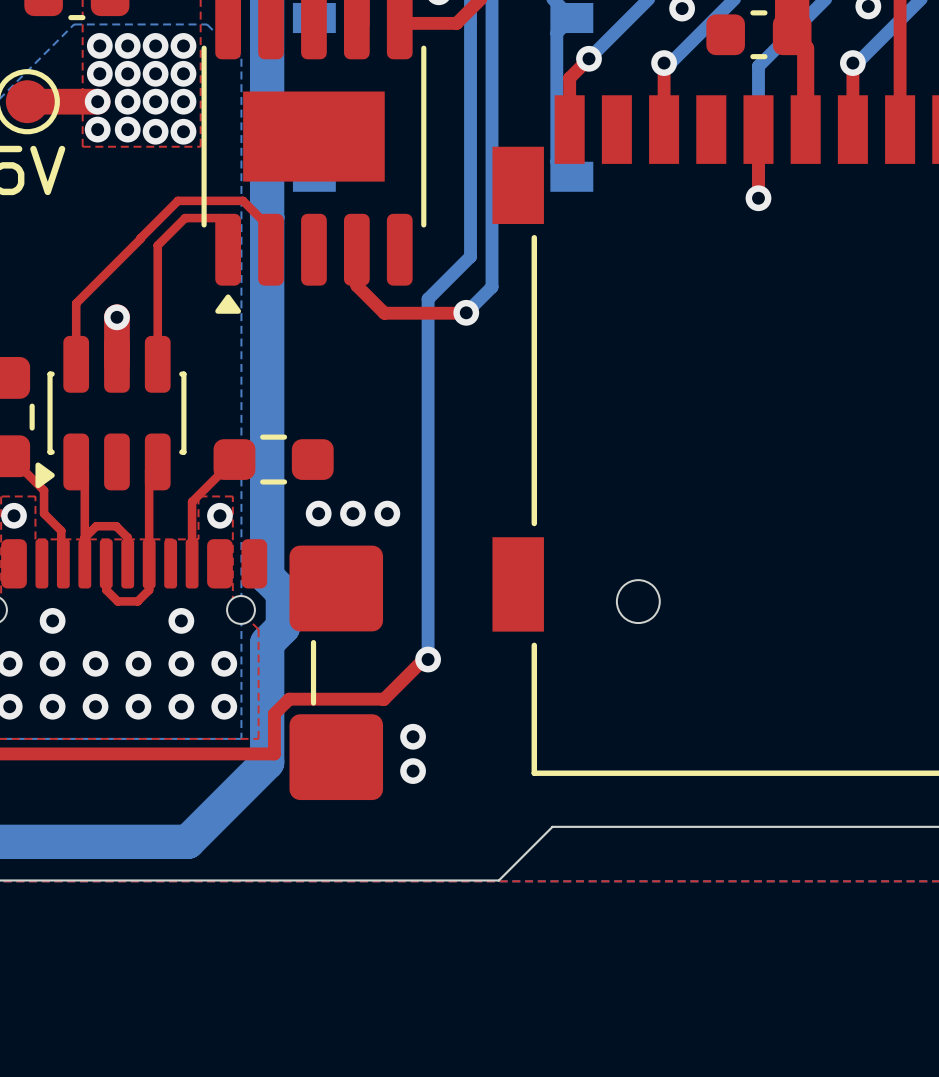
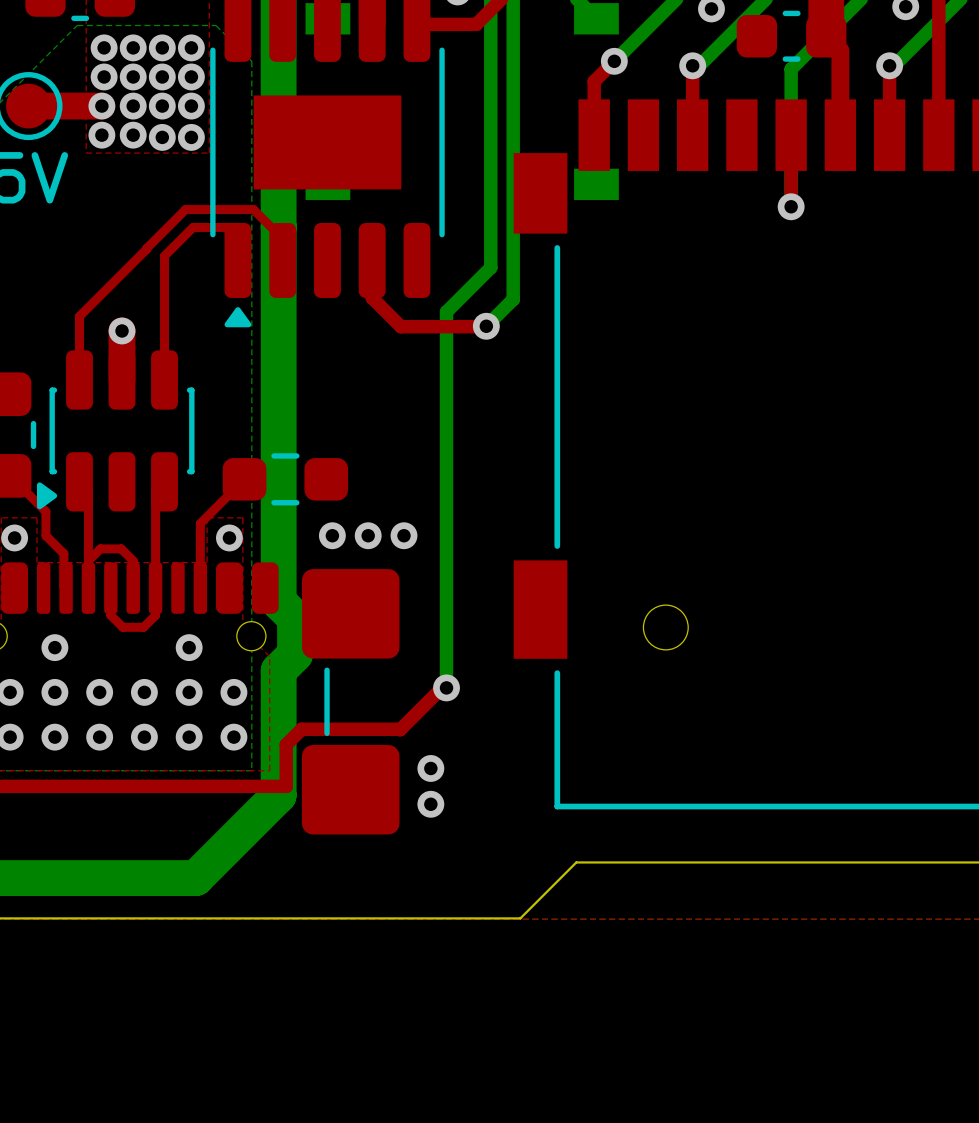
bottom track: (571, 18) (556, 33) (556, 161) (571, 176) -> none

